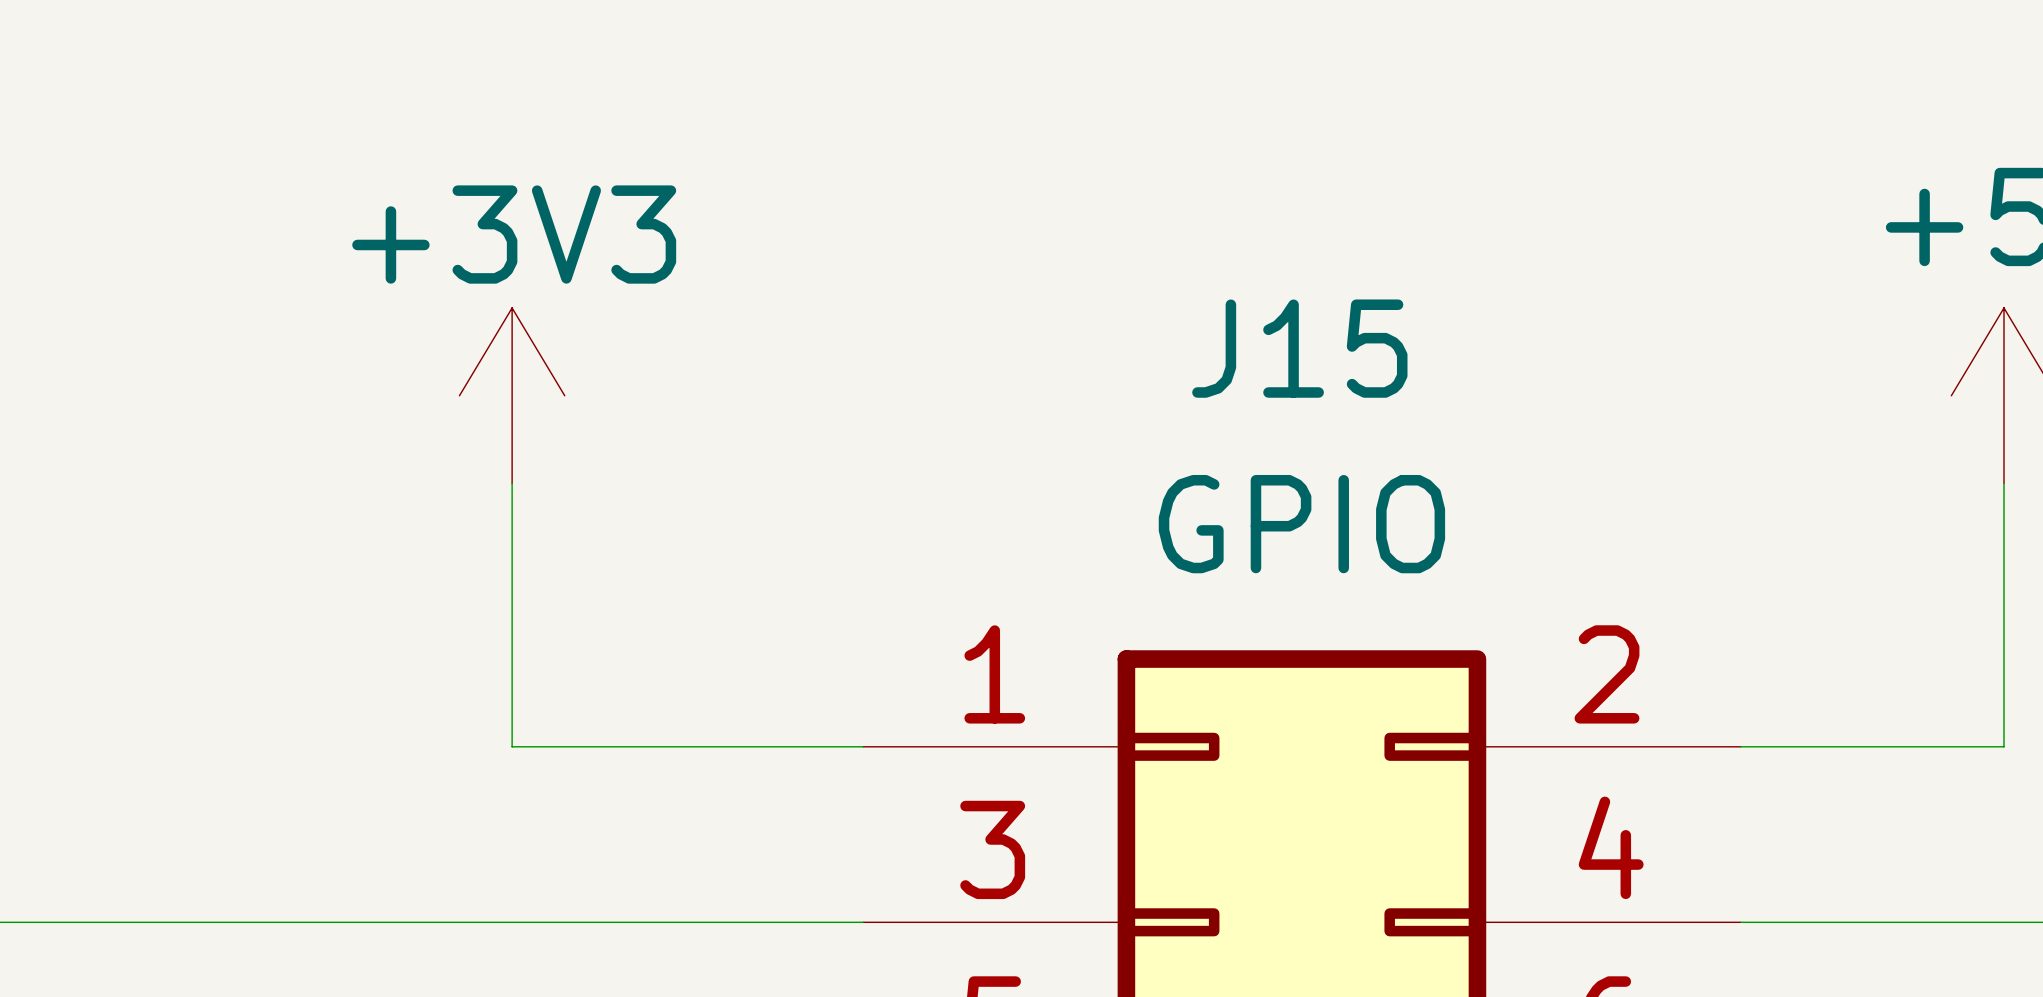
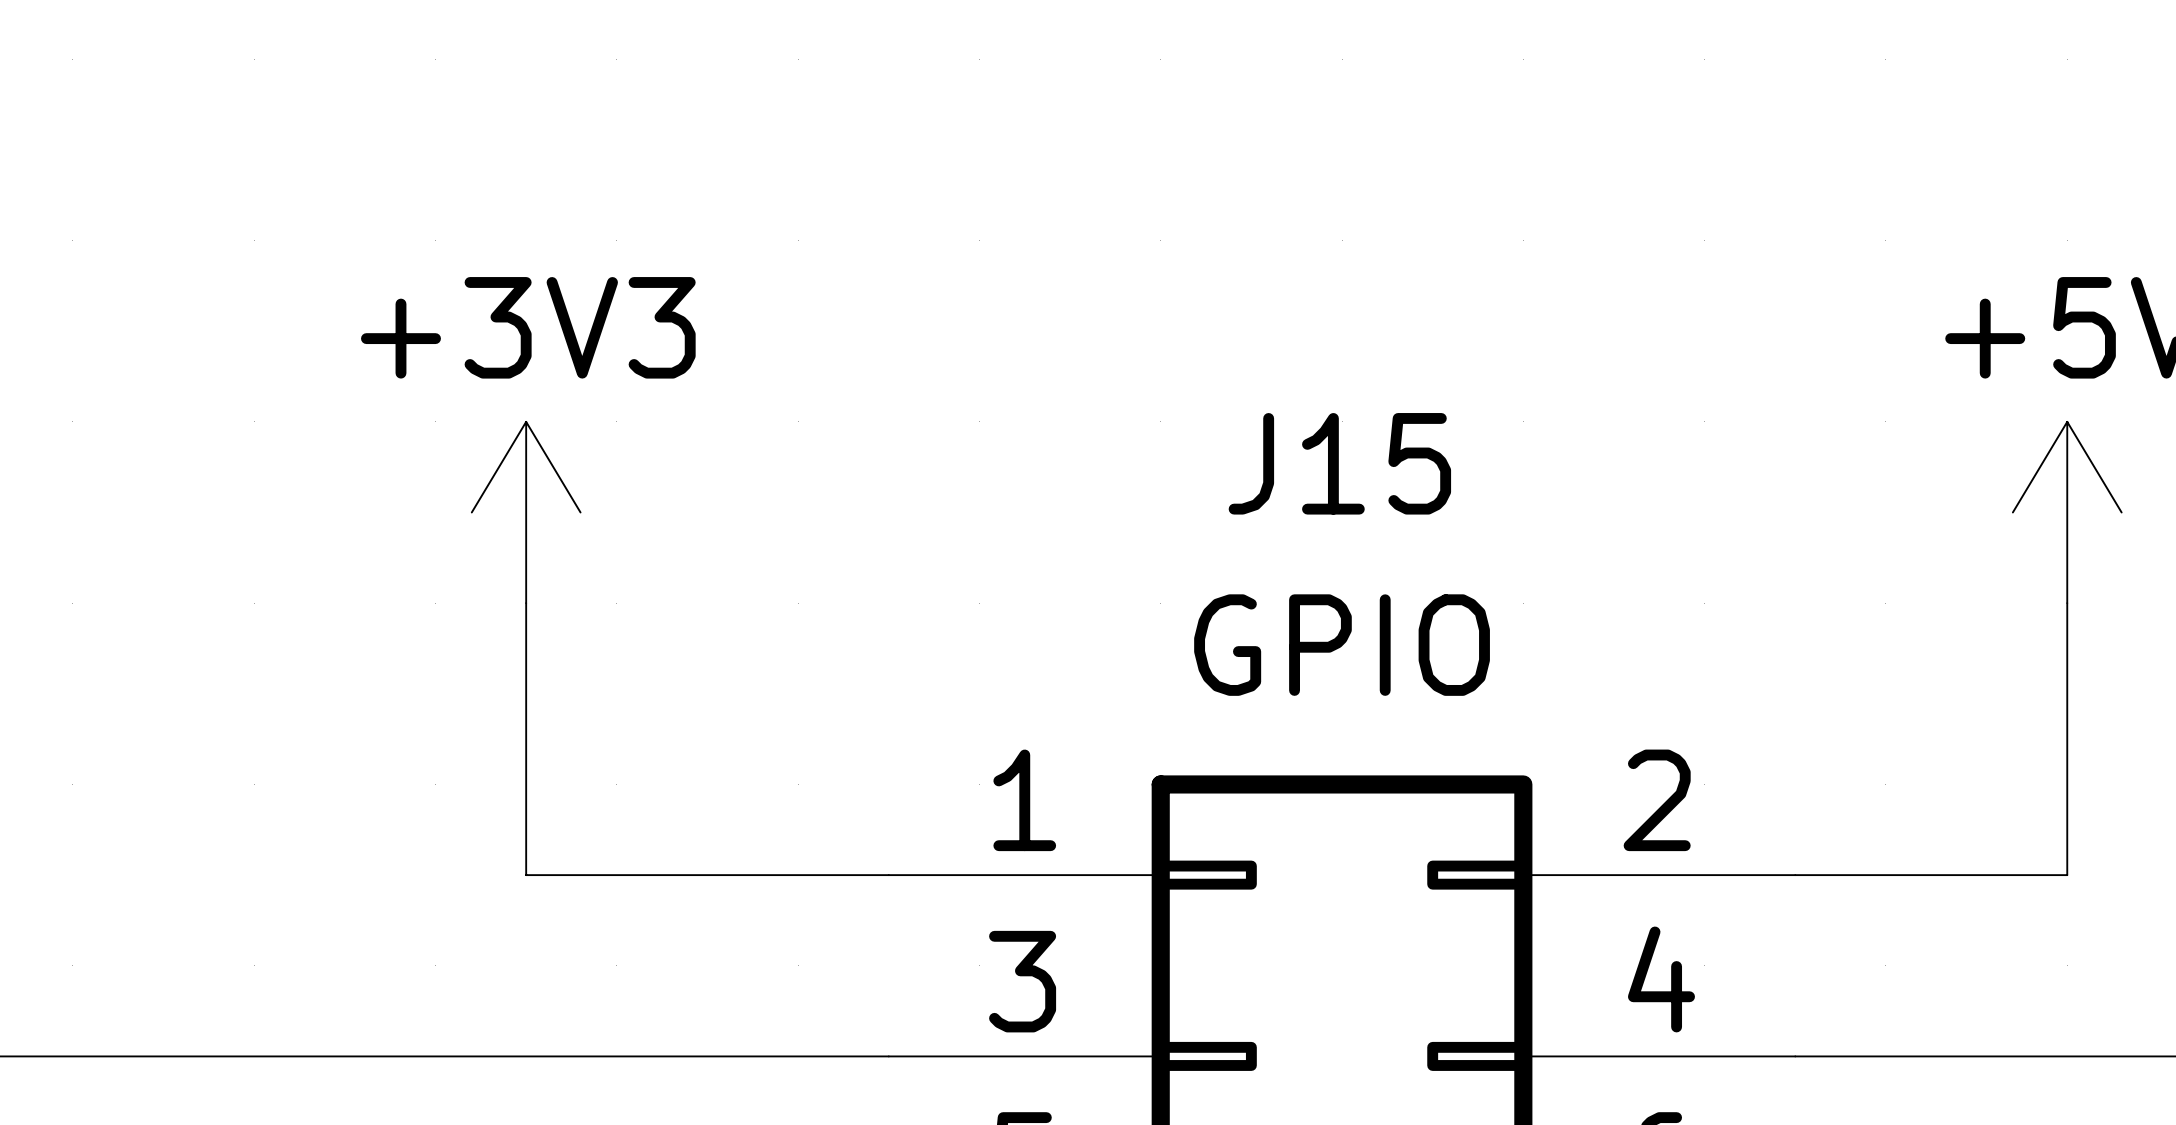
power symbol text position: +3V3 (514, 234) -> +3V3 (528, 327)

